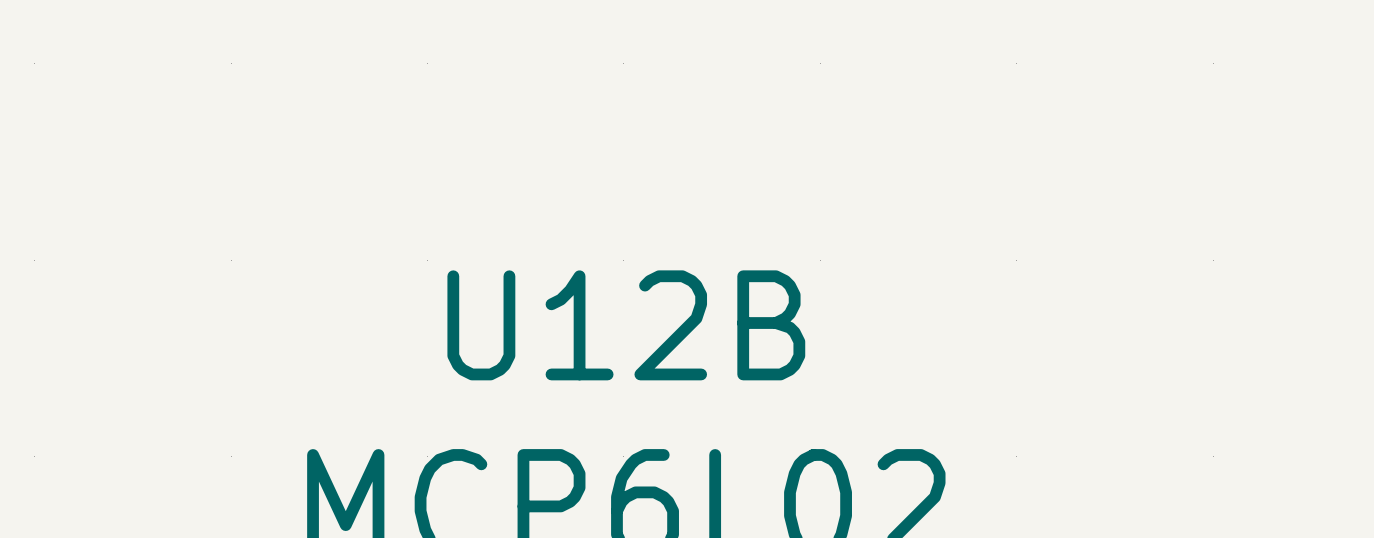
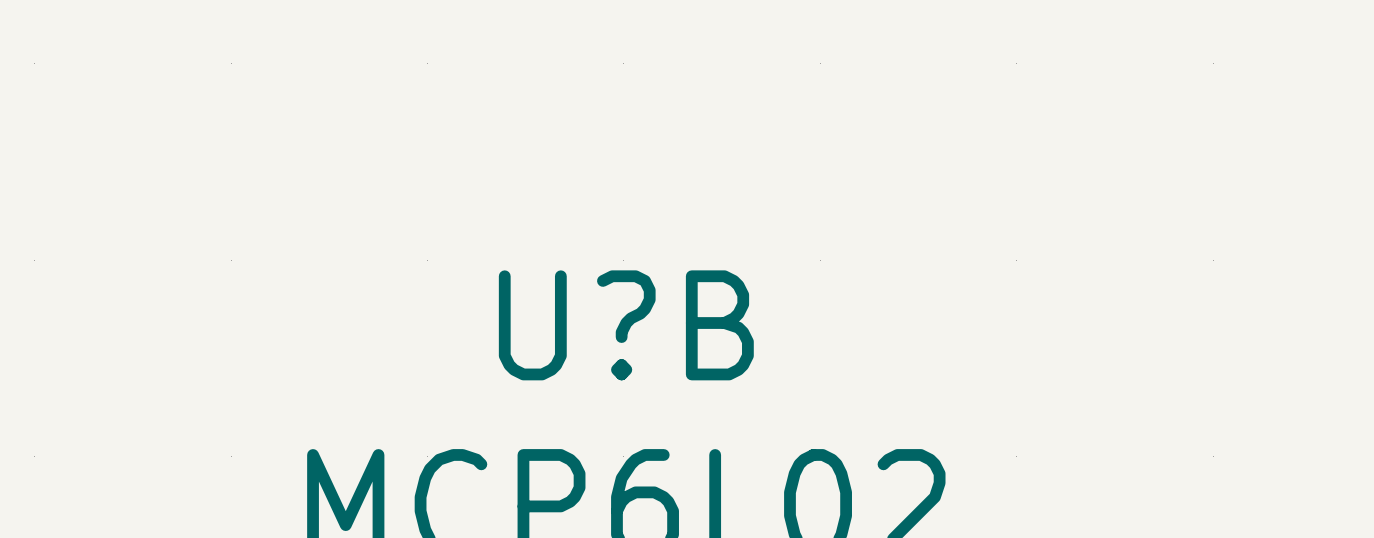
U12B name: U12B (626, 325) -> U?B (626, 325)

